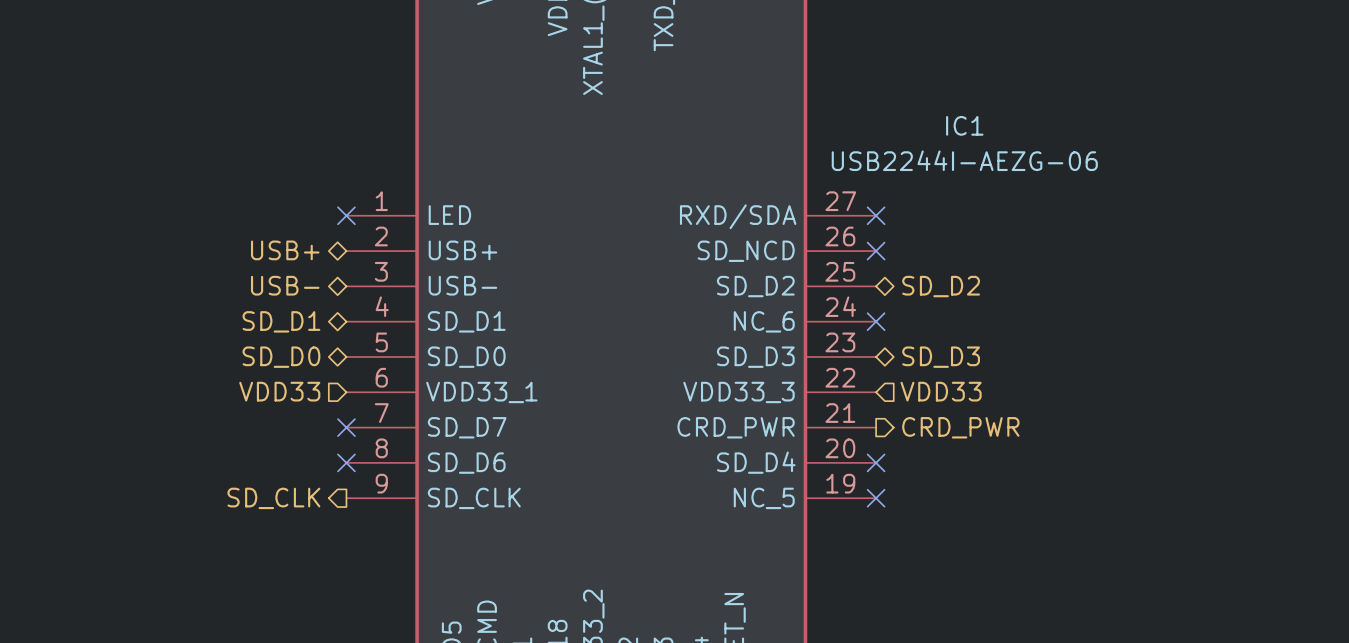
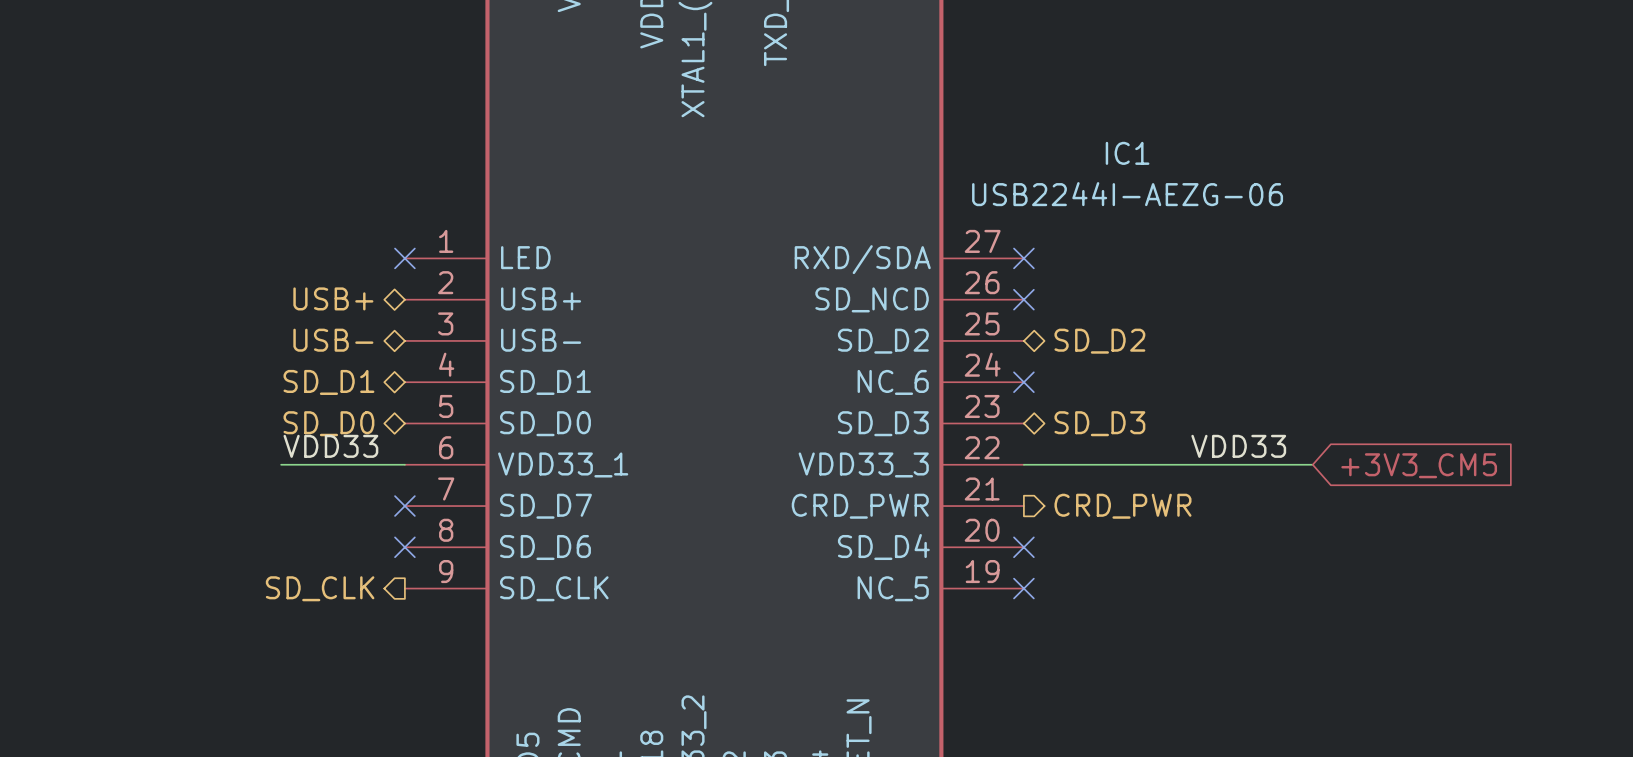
label: none -> VDD33 (330, 446)
label: none -> VDD33 (1238, 446)
hierarchical label: VDD33 (279, 391) -> none
hierarchical label: VDD33 (941, 391) -> none
wire: none -> (281, 464) (404, 464)
wire: none -> (1023, 464) (1312, 464)
global label: none -> +3V3_CM5 (1419, 465)

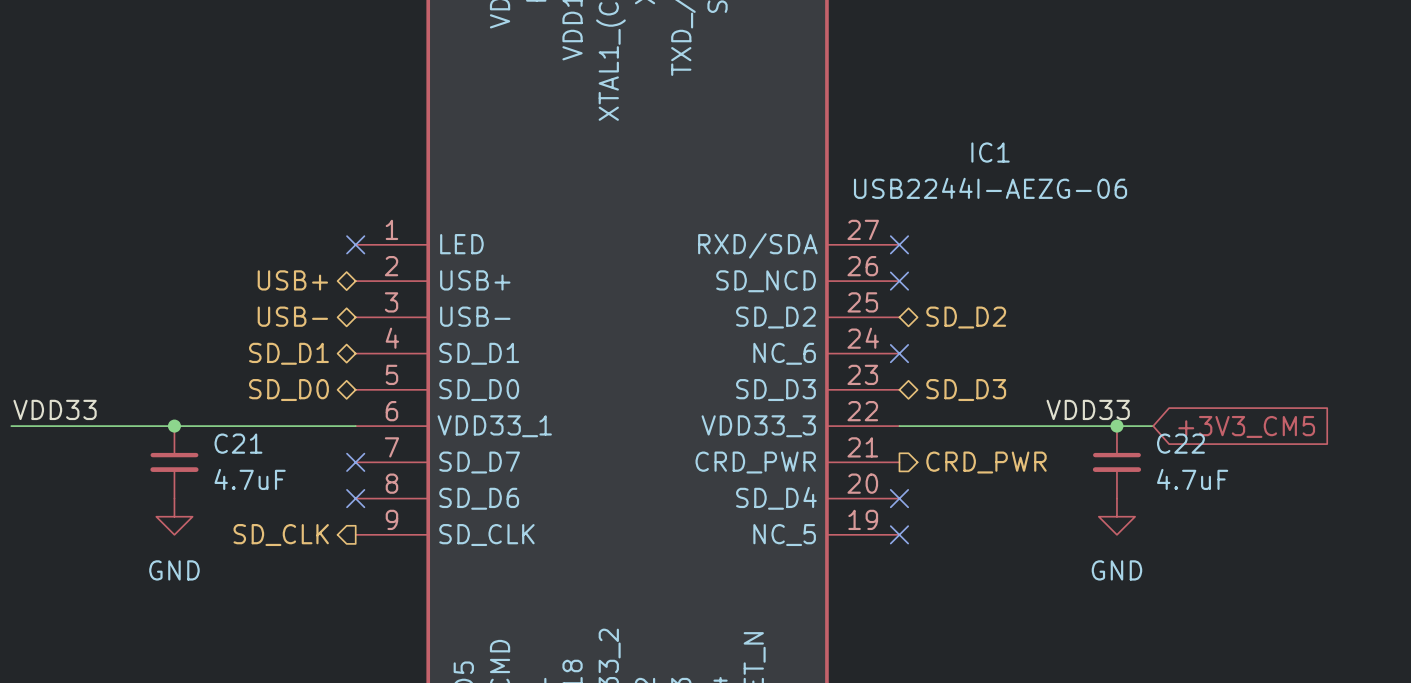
label position: VDD33 (330, 446) -> VDD33 (55, 409)
wire: none -> (11, 426) (246, 426)
junction: none -> (174, 426)
junction: none -> (1116, 426)
C21: none -> 4.7uF (174, 462)
C22: none -> 4.7uF (1116, 462)
power symbol: none -> GND (174, 516)
power symbol: none -> GND (1116, 516)

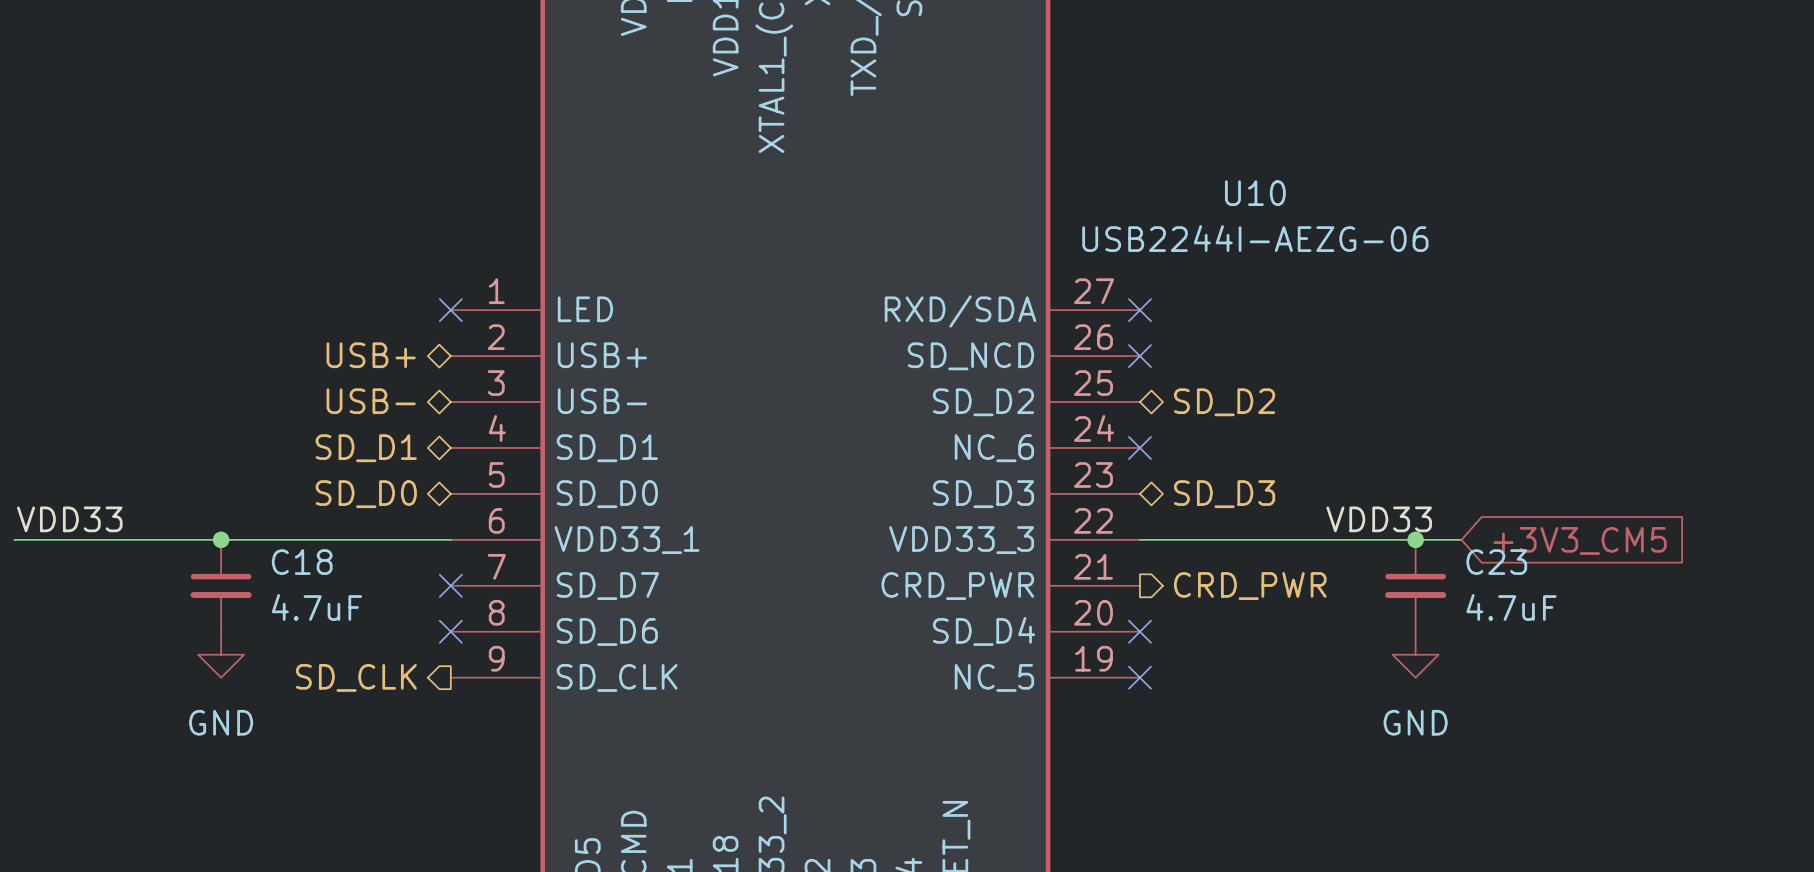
IC1 name: IC1 (990, 152) -> U10 (1255, 193)
C21 name: C21 (238, 443) -> C18 (302, 562)
C22 name: C22 (1180, 443) -> C23 (1496, 562)

